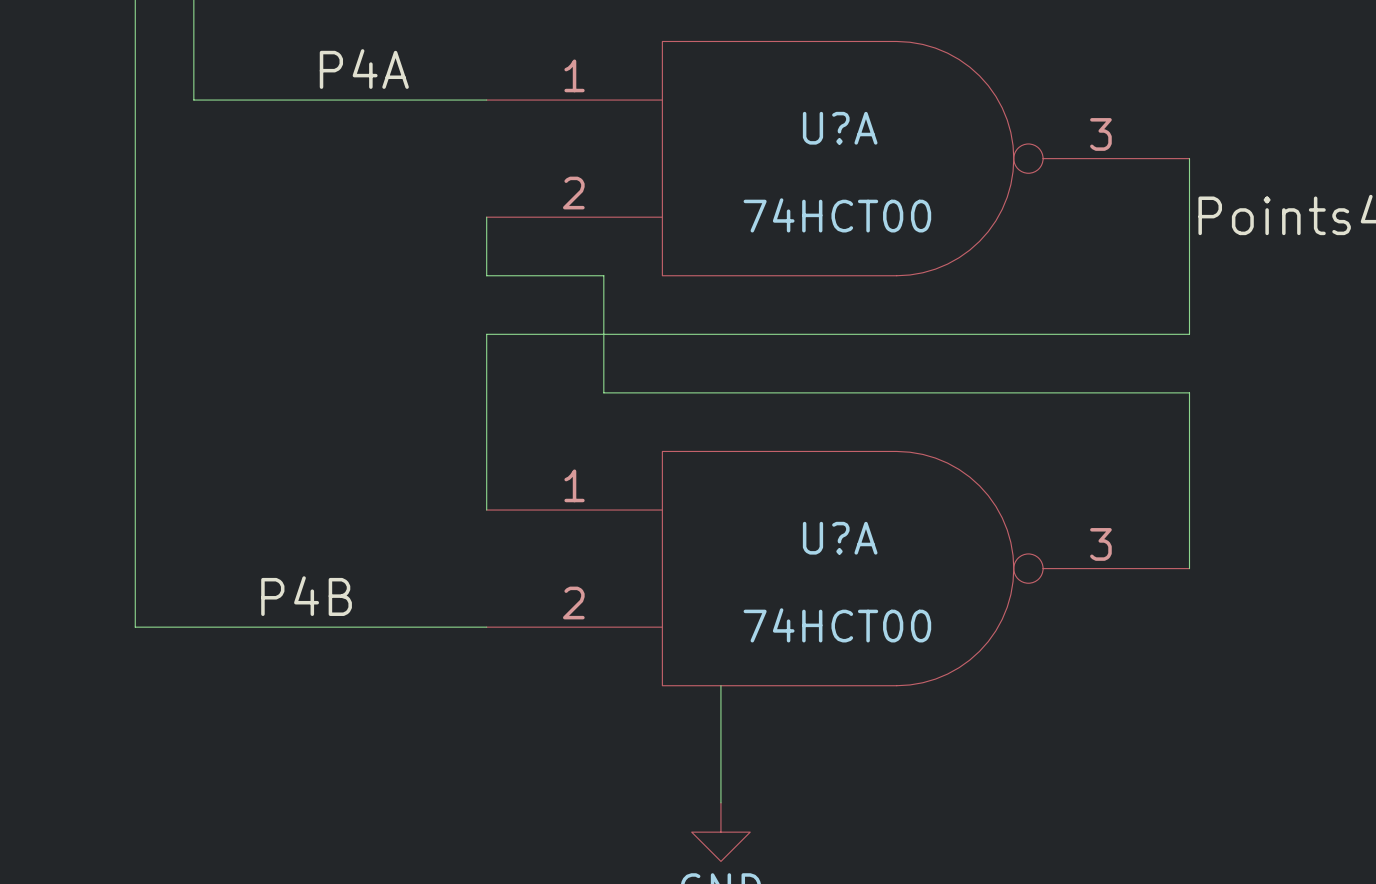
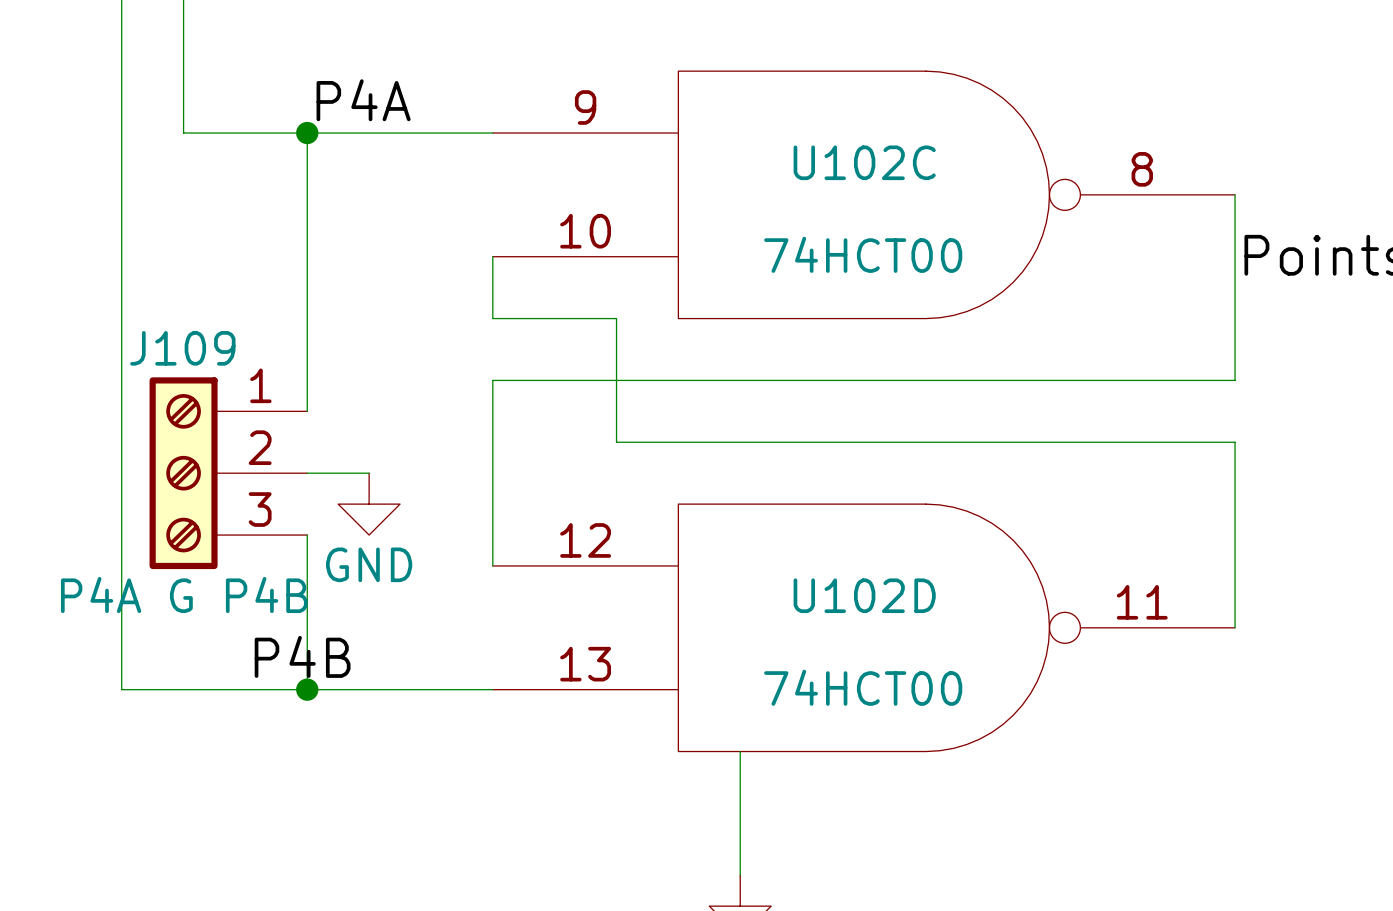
U?A pin number: 1 (574, 75) -> 9 (585, 107)
wire: none -> (307, 133) (307, 411)
junction: none -> (307, 133)
U?A name: U?A (840, 128) -> U102C (864, 162)
U?A pin number: 3 (1100, 134) -> 8 (1142, 169)
U?A pin number: 2 (573, 193) -> 10 (585, 231)
J109: none -> P4A G P4B (228, 473)
wire: none -> (307, 473) (369, 473)
power symbol: none -> GND (369, 504)
wire: none -> (307, 535) (307, 689)
U?A pin number: 1 (574, 485) -> 12 (585, 540)
U?A name: U?A (840, 538) -> U102D (864, 595)
U?A pin number: 3 (1100, 544) -> 11 (1142, 602)
U?A pin number: 2 (573, 603) -> 13 (585, 664)
junction: none -> (307, 689)

